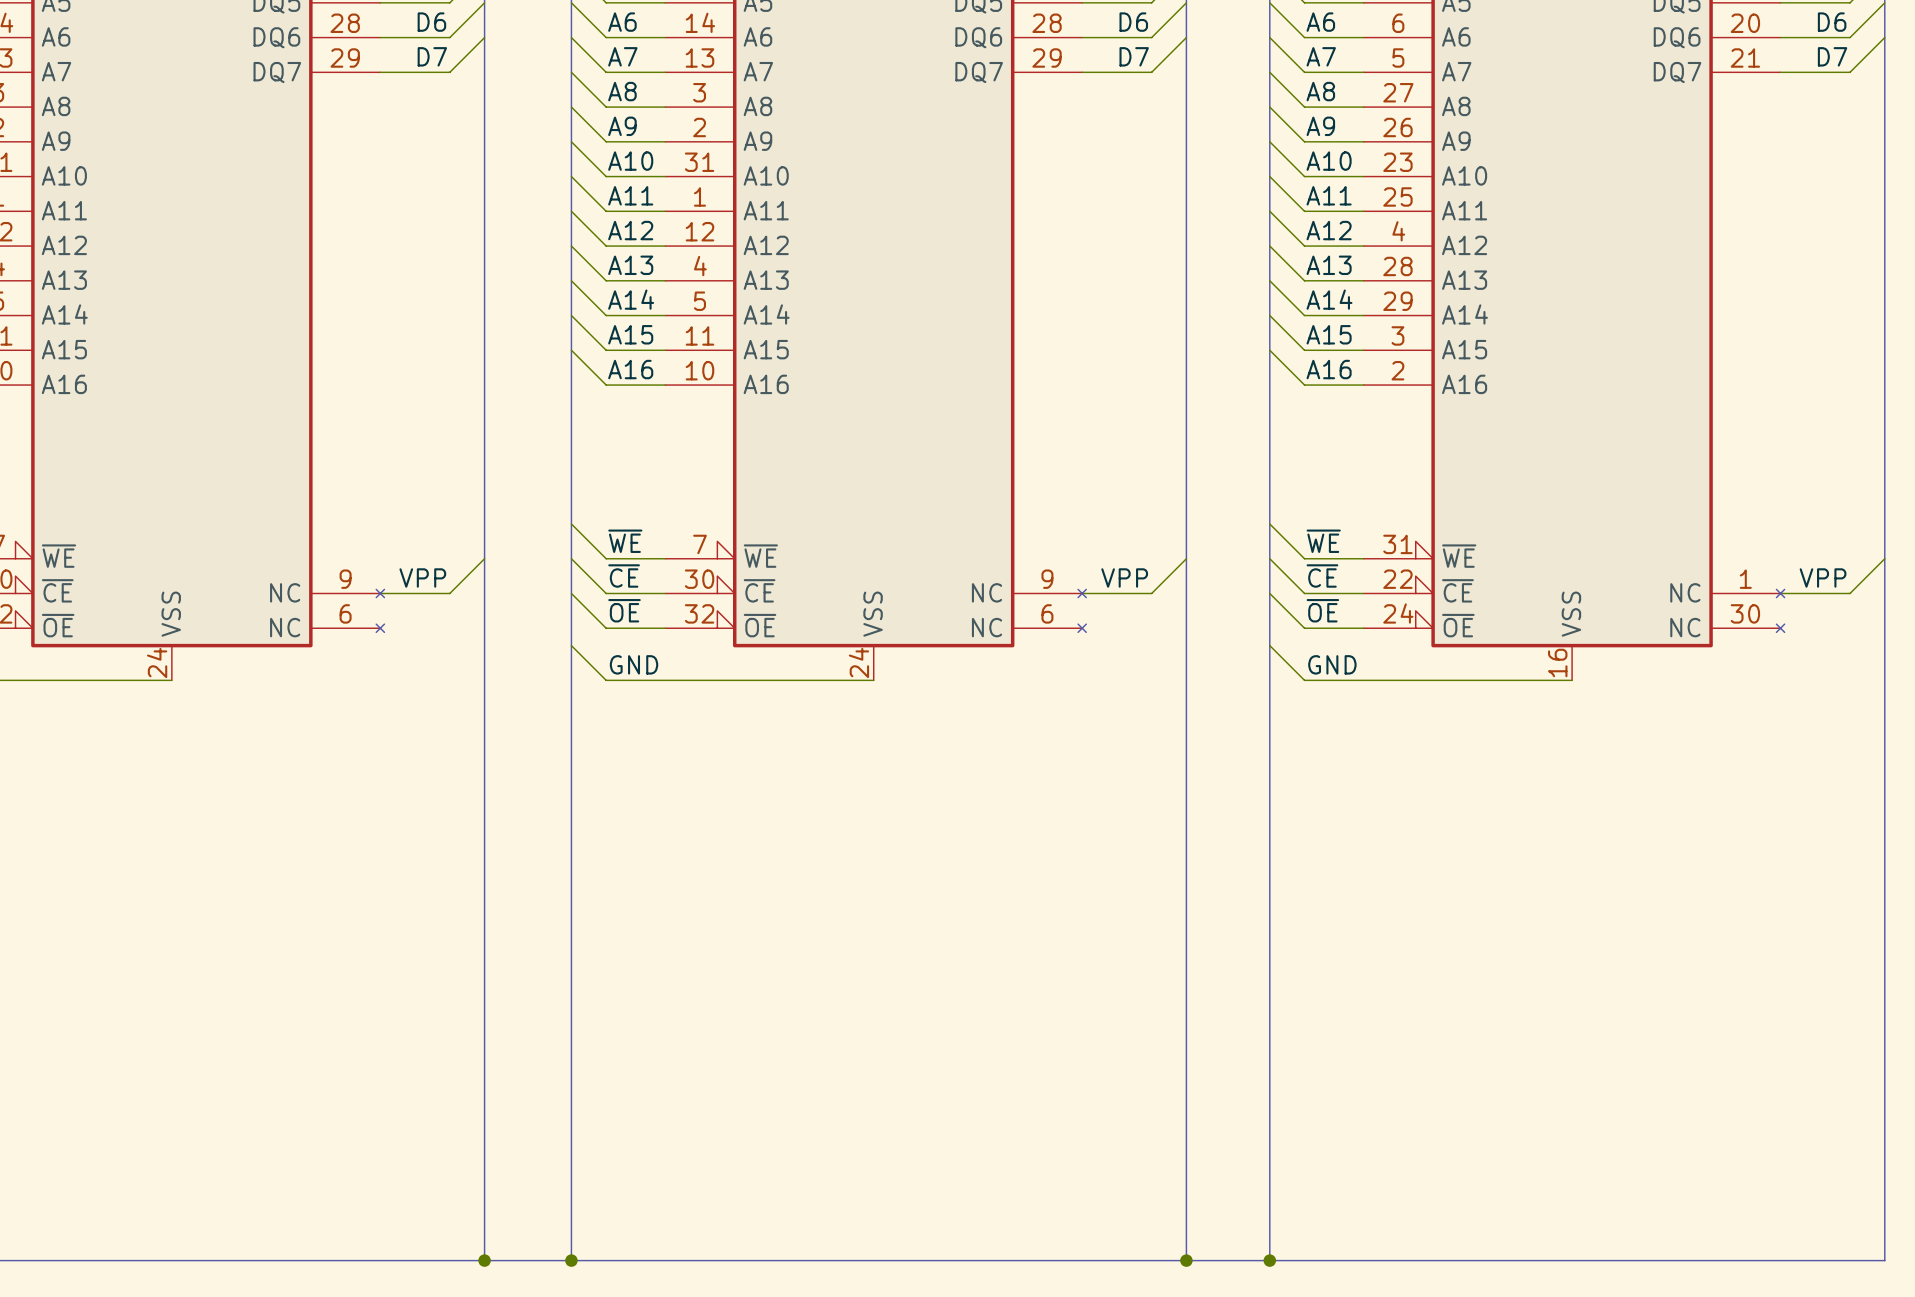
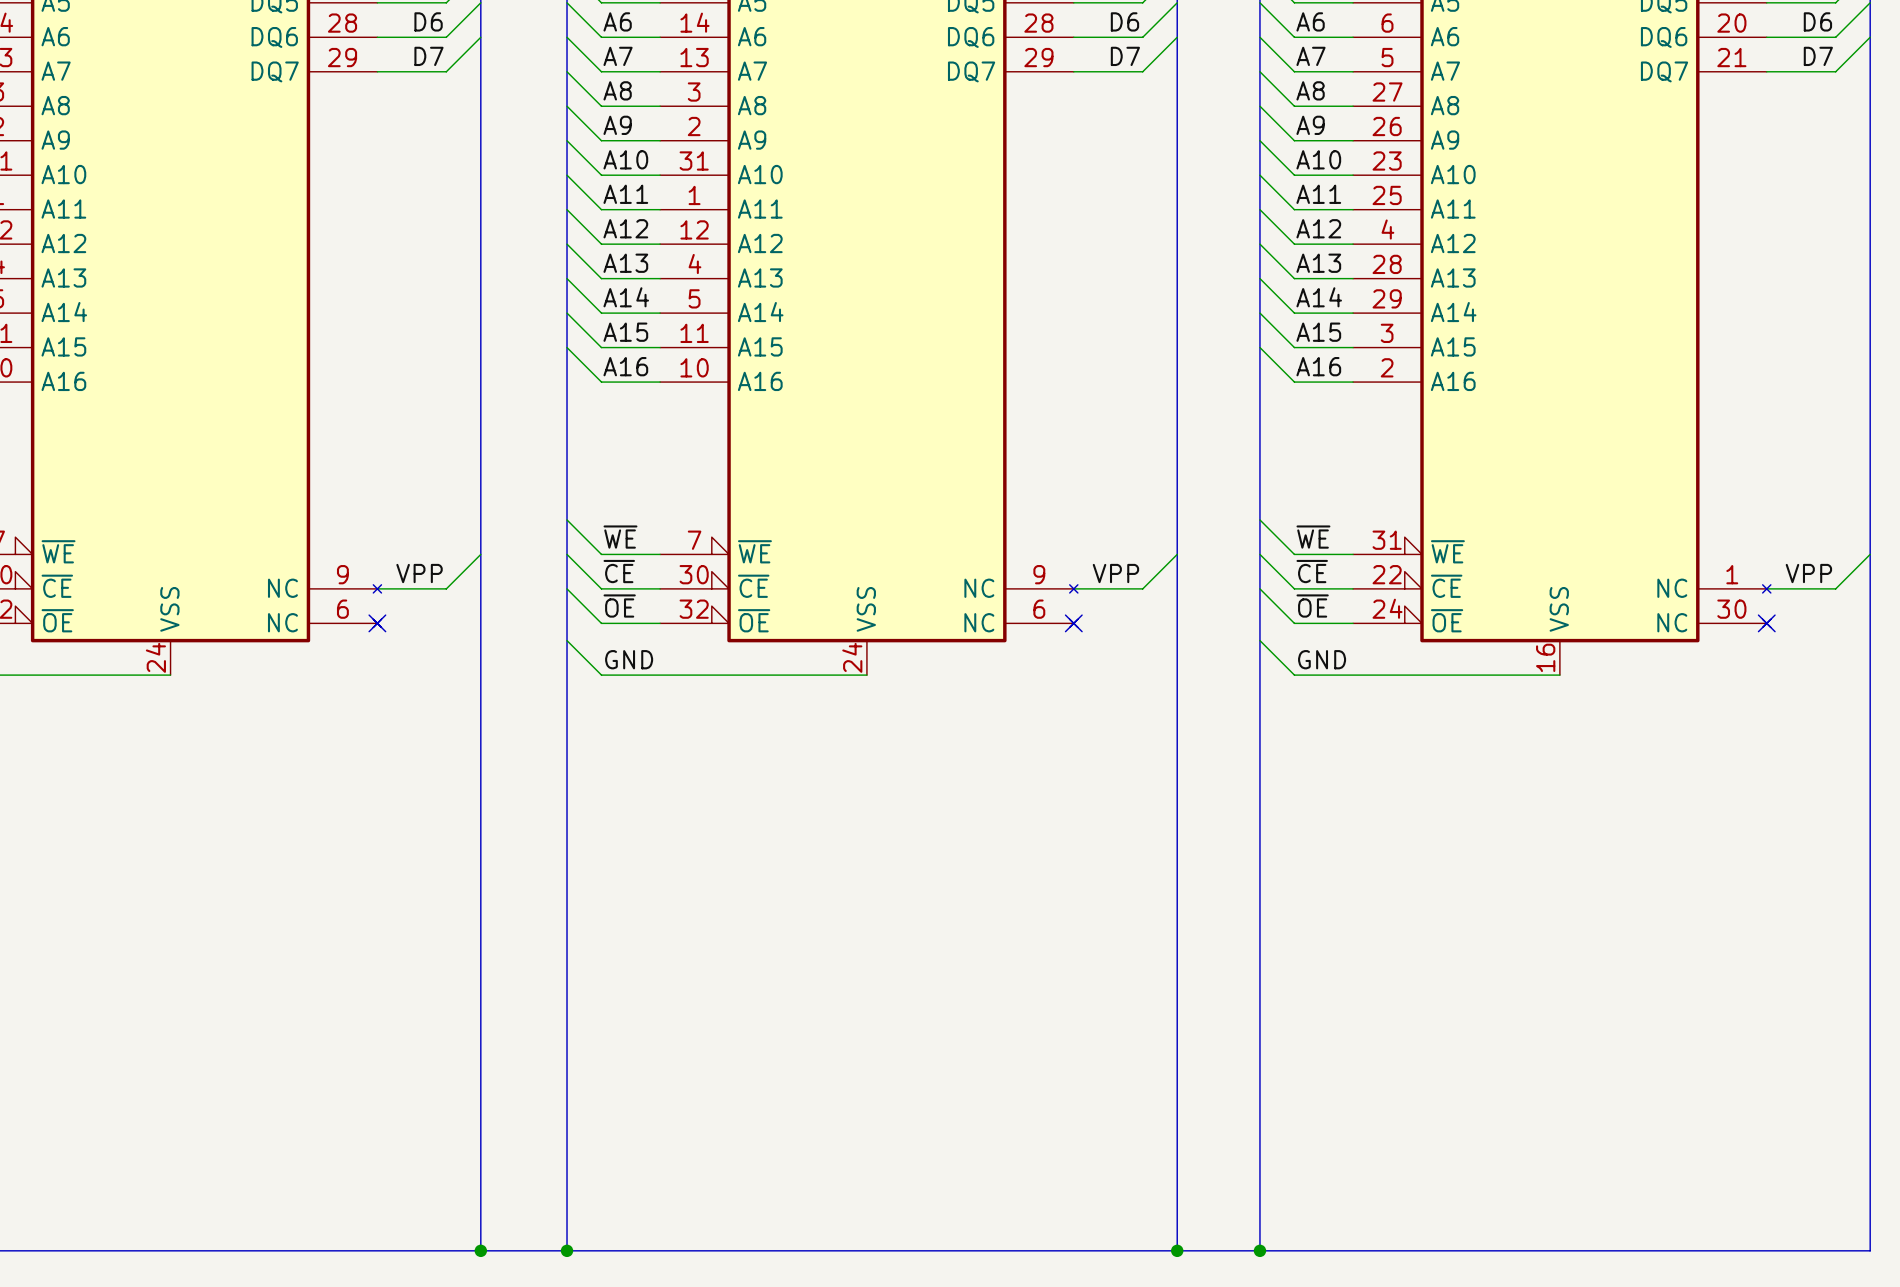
no-connect mark: none -> (377, 623)
no-connect mark: none -> (1073, 623)
no-connect mark: none -> (1766, 623)

